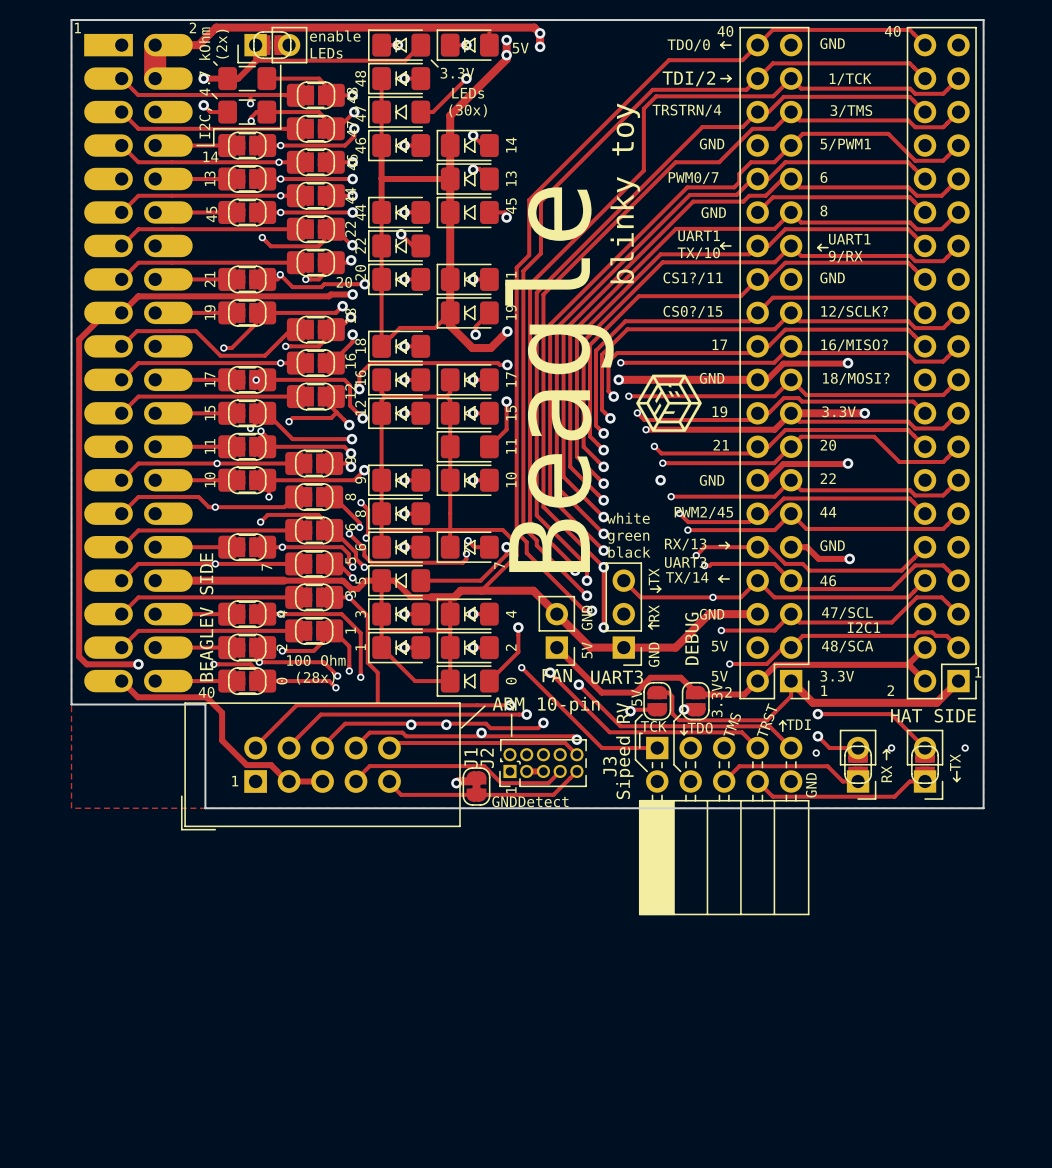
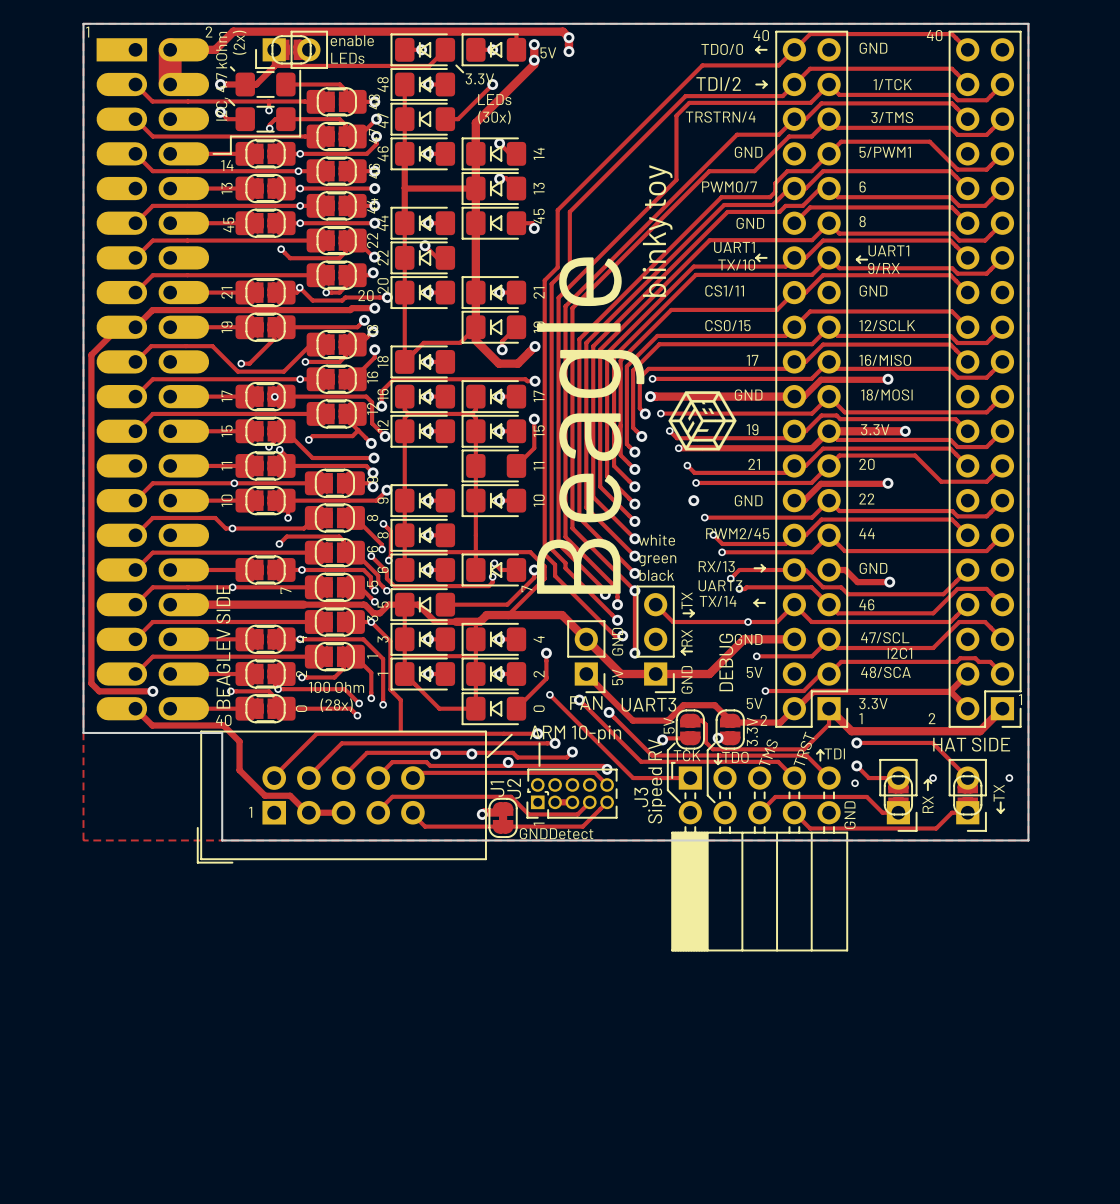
text: CS1?/11 (692, 278) -> CS1/11 (724, 290)
text: CS0?/15 (692, 311) -> CS0/15 (727, 325)
text: 12/SCLK? (854, 311) -> 12/SCLK (887, 325)
text: 16/MISO? (854, 345) -> 16/MISO (885, 360)
text: 18/MOSI? (856, 378) -> 18/MOSI (886, 394)

